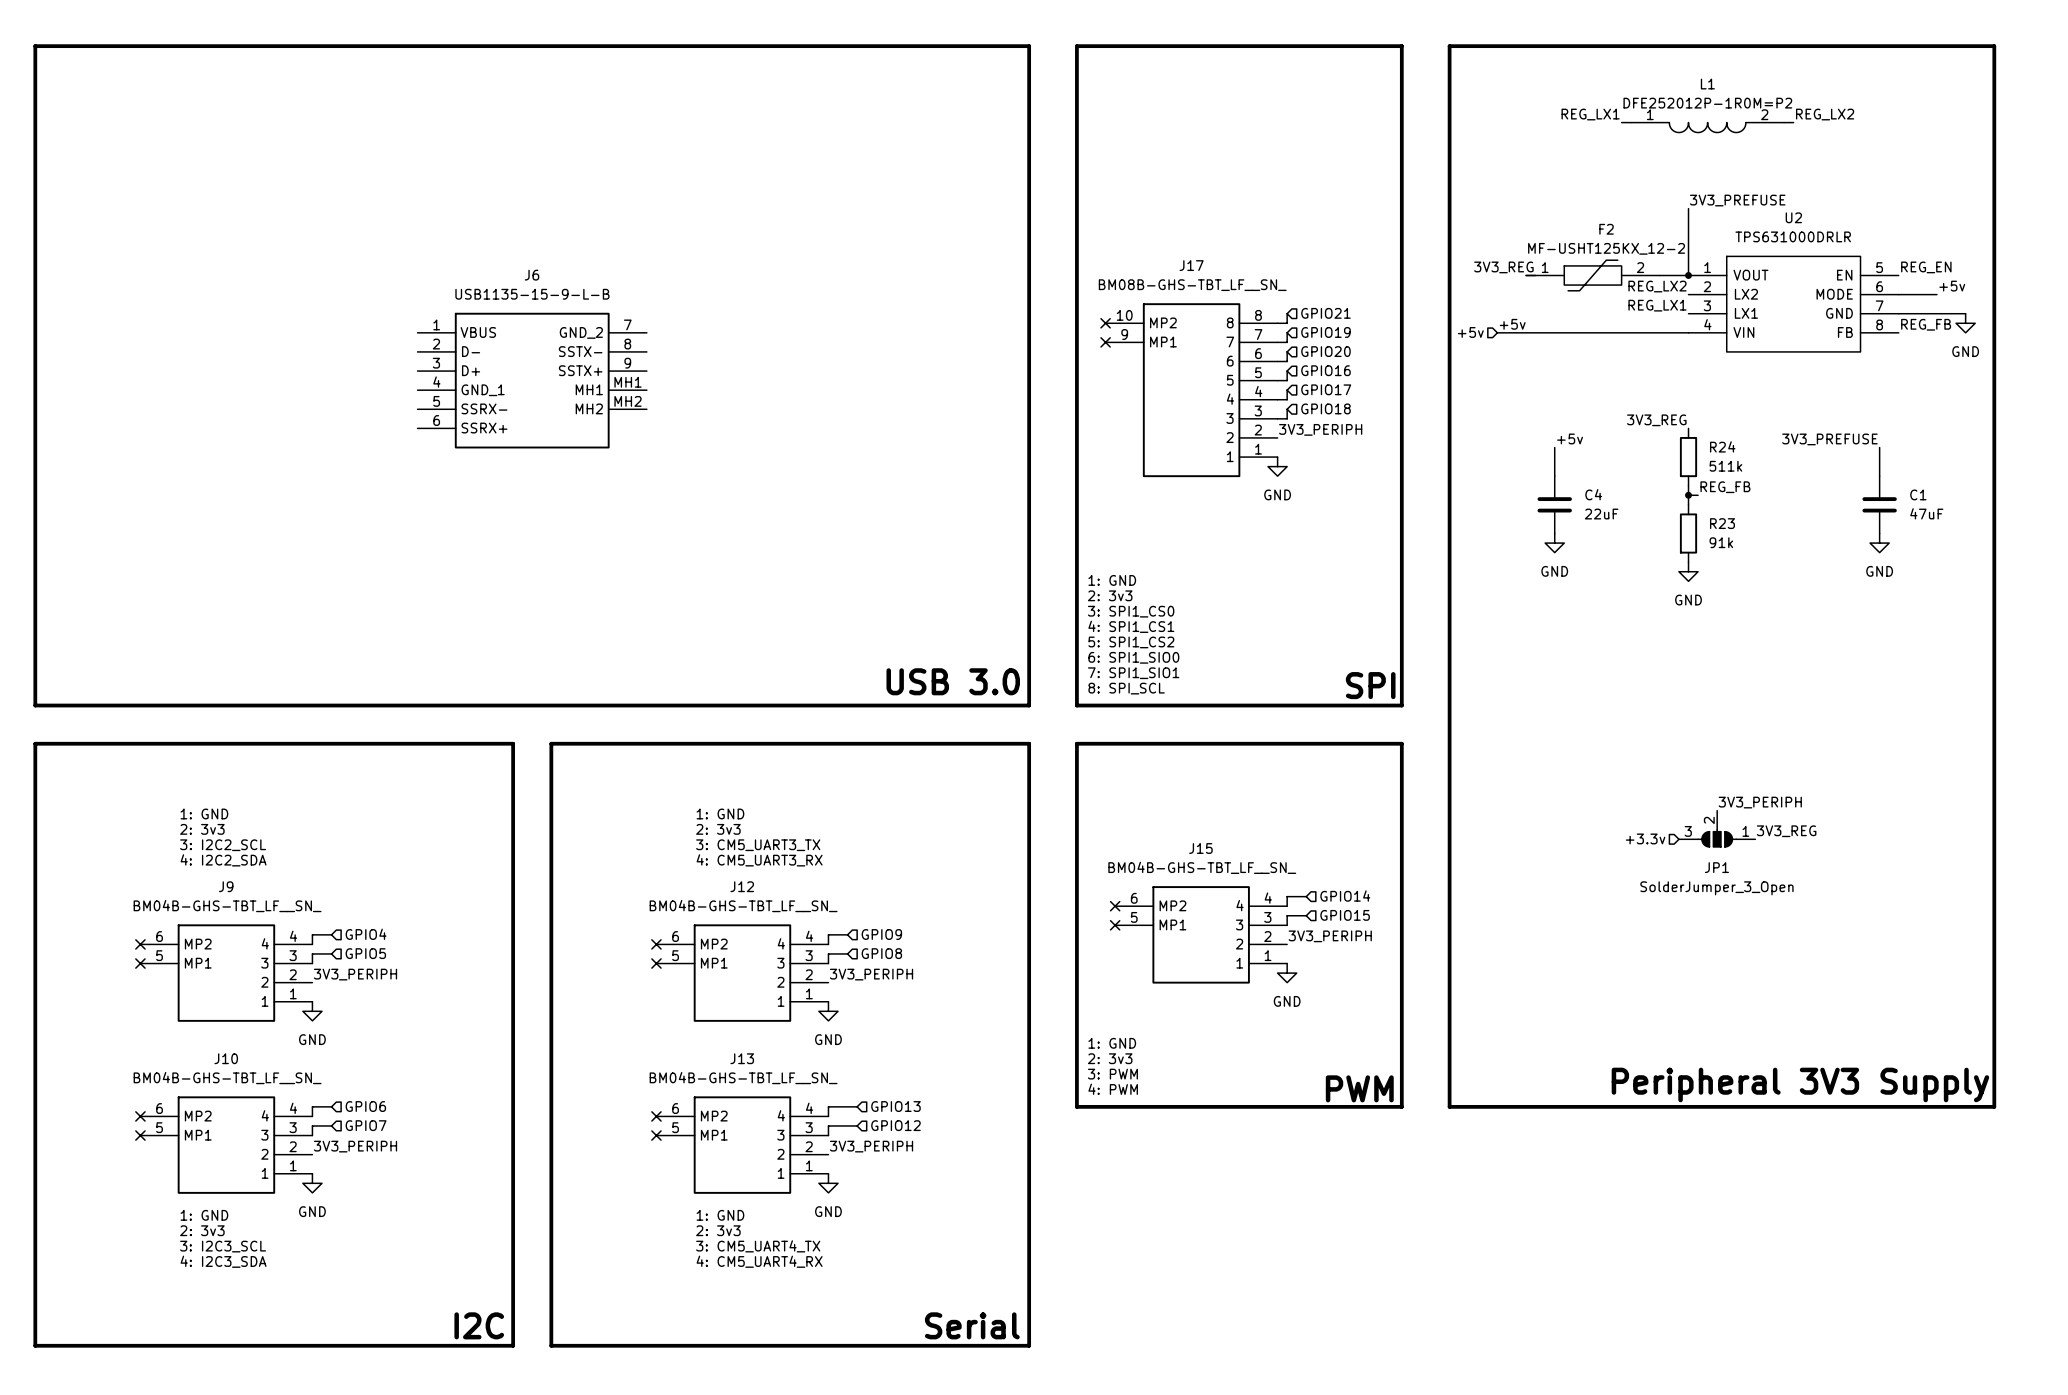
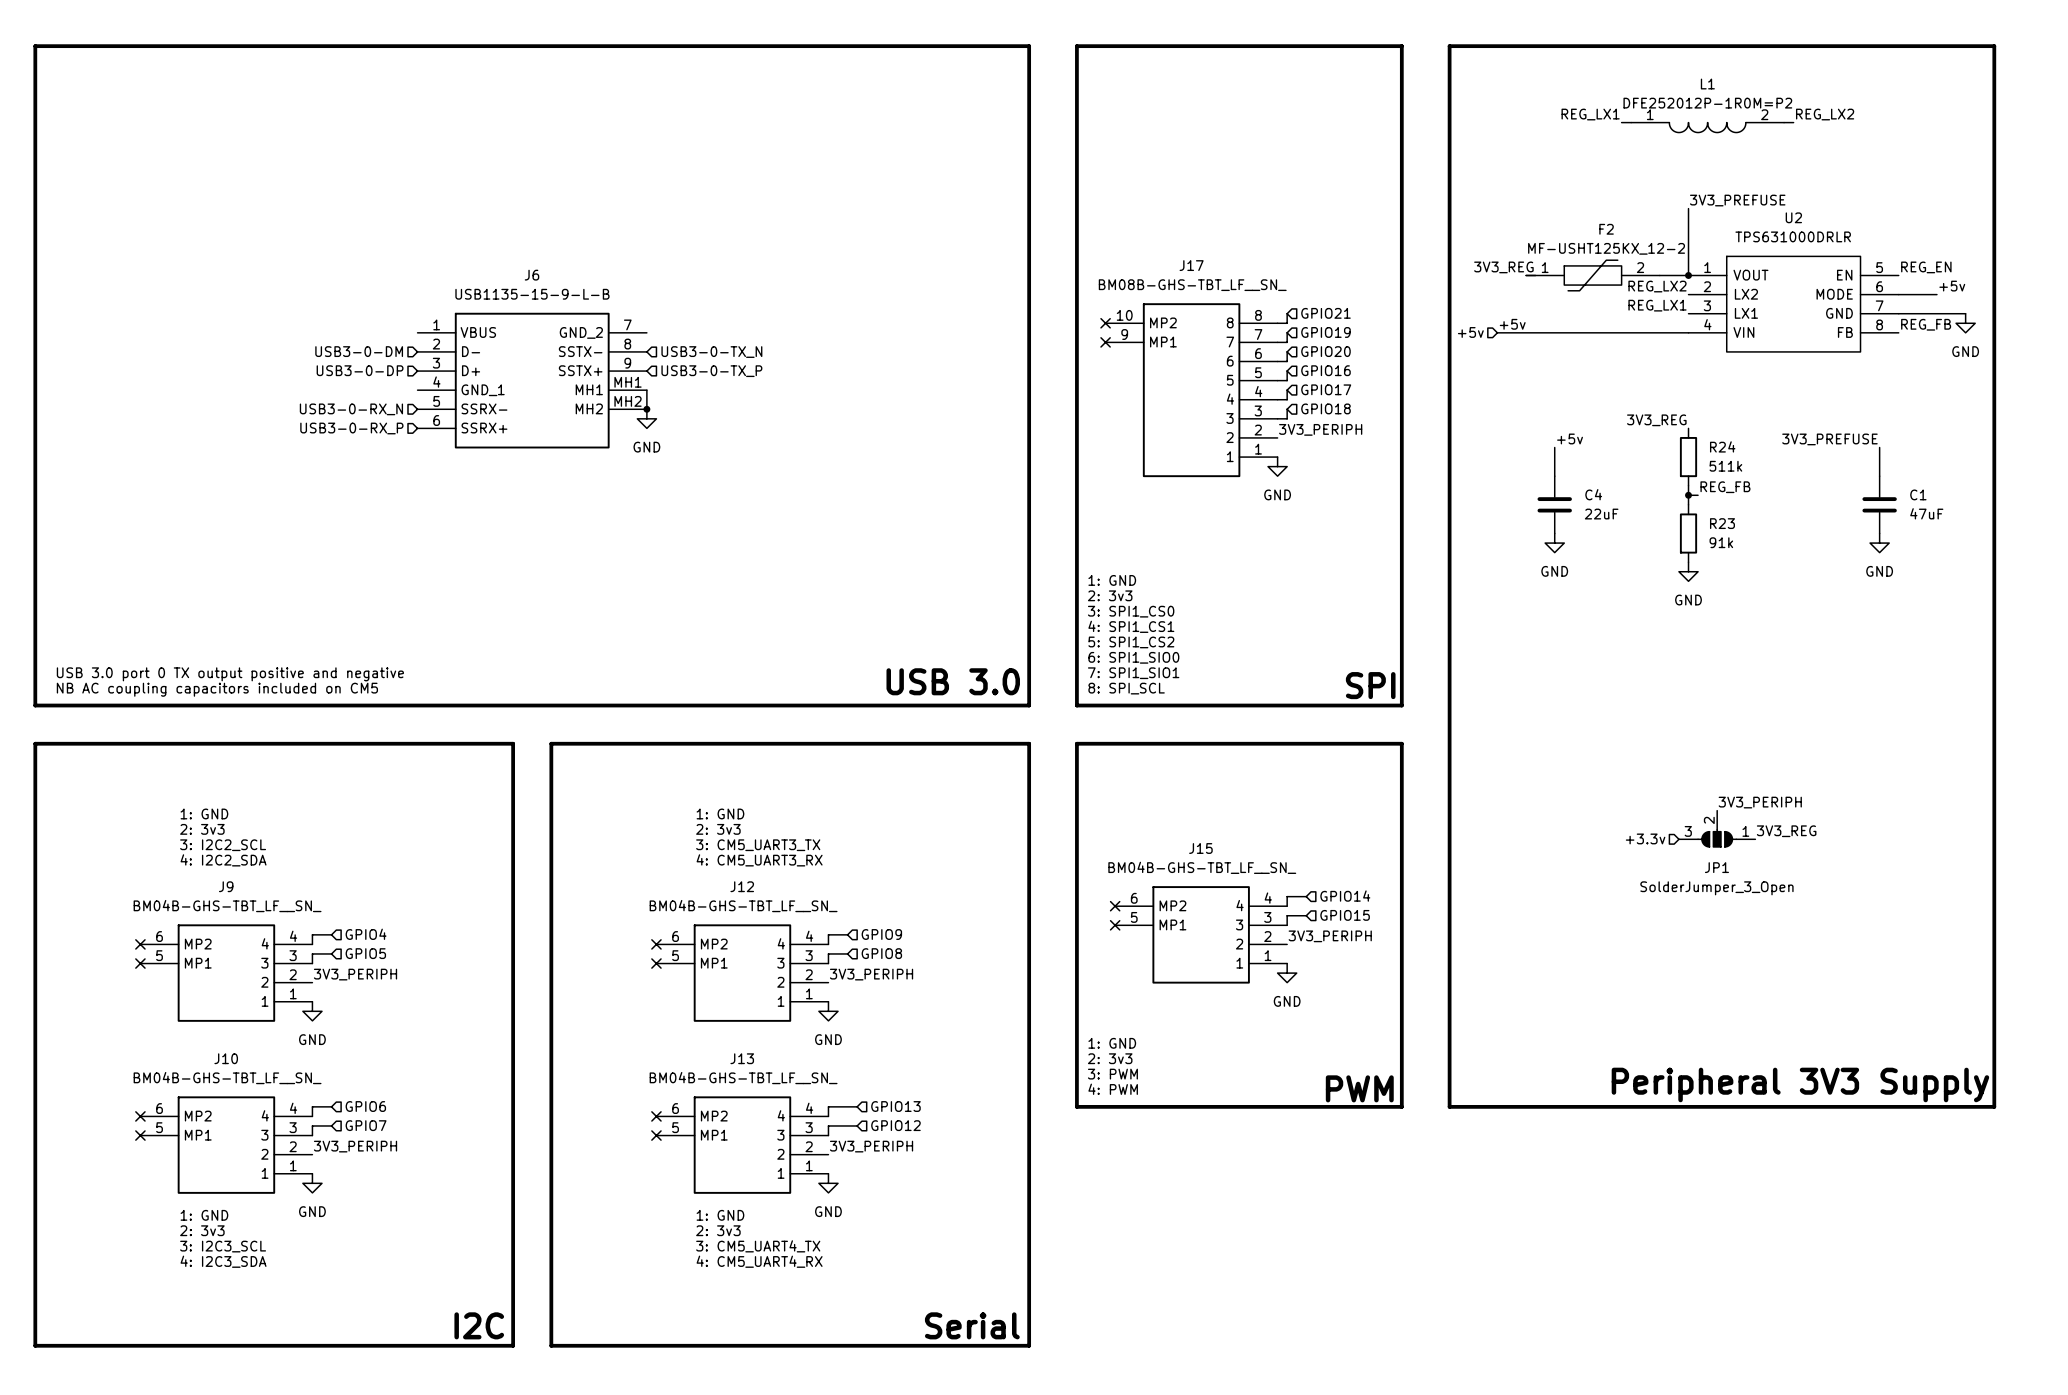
hierarchical label: none -> USB3-0-DM (359, 351)
hierarchical label: none -> USB3-0-TX_N (711, 352)
hierarchical label: none -> USB3-0-DP (360, 370)
hierarchical label: none -> USB3-0-TX_P (711, 371)
wire: none -> (646, 390) (646, 409)
hierarchical label: none -> USB3-0-RX_N (351, 409)
junction: none -> (646, 409)
power symbol: none -> GND (646, 418)
hierarchical label: none -> USB3-0-RX_P (351, 428)
text: none -> USB 3.0 port 0 TX output positive and negative (230, 674)
text: none -> NB AC coupling capacitors included on CM5 (217, 689)

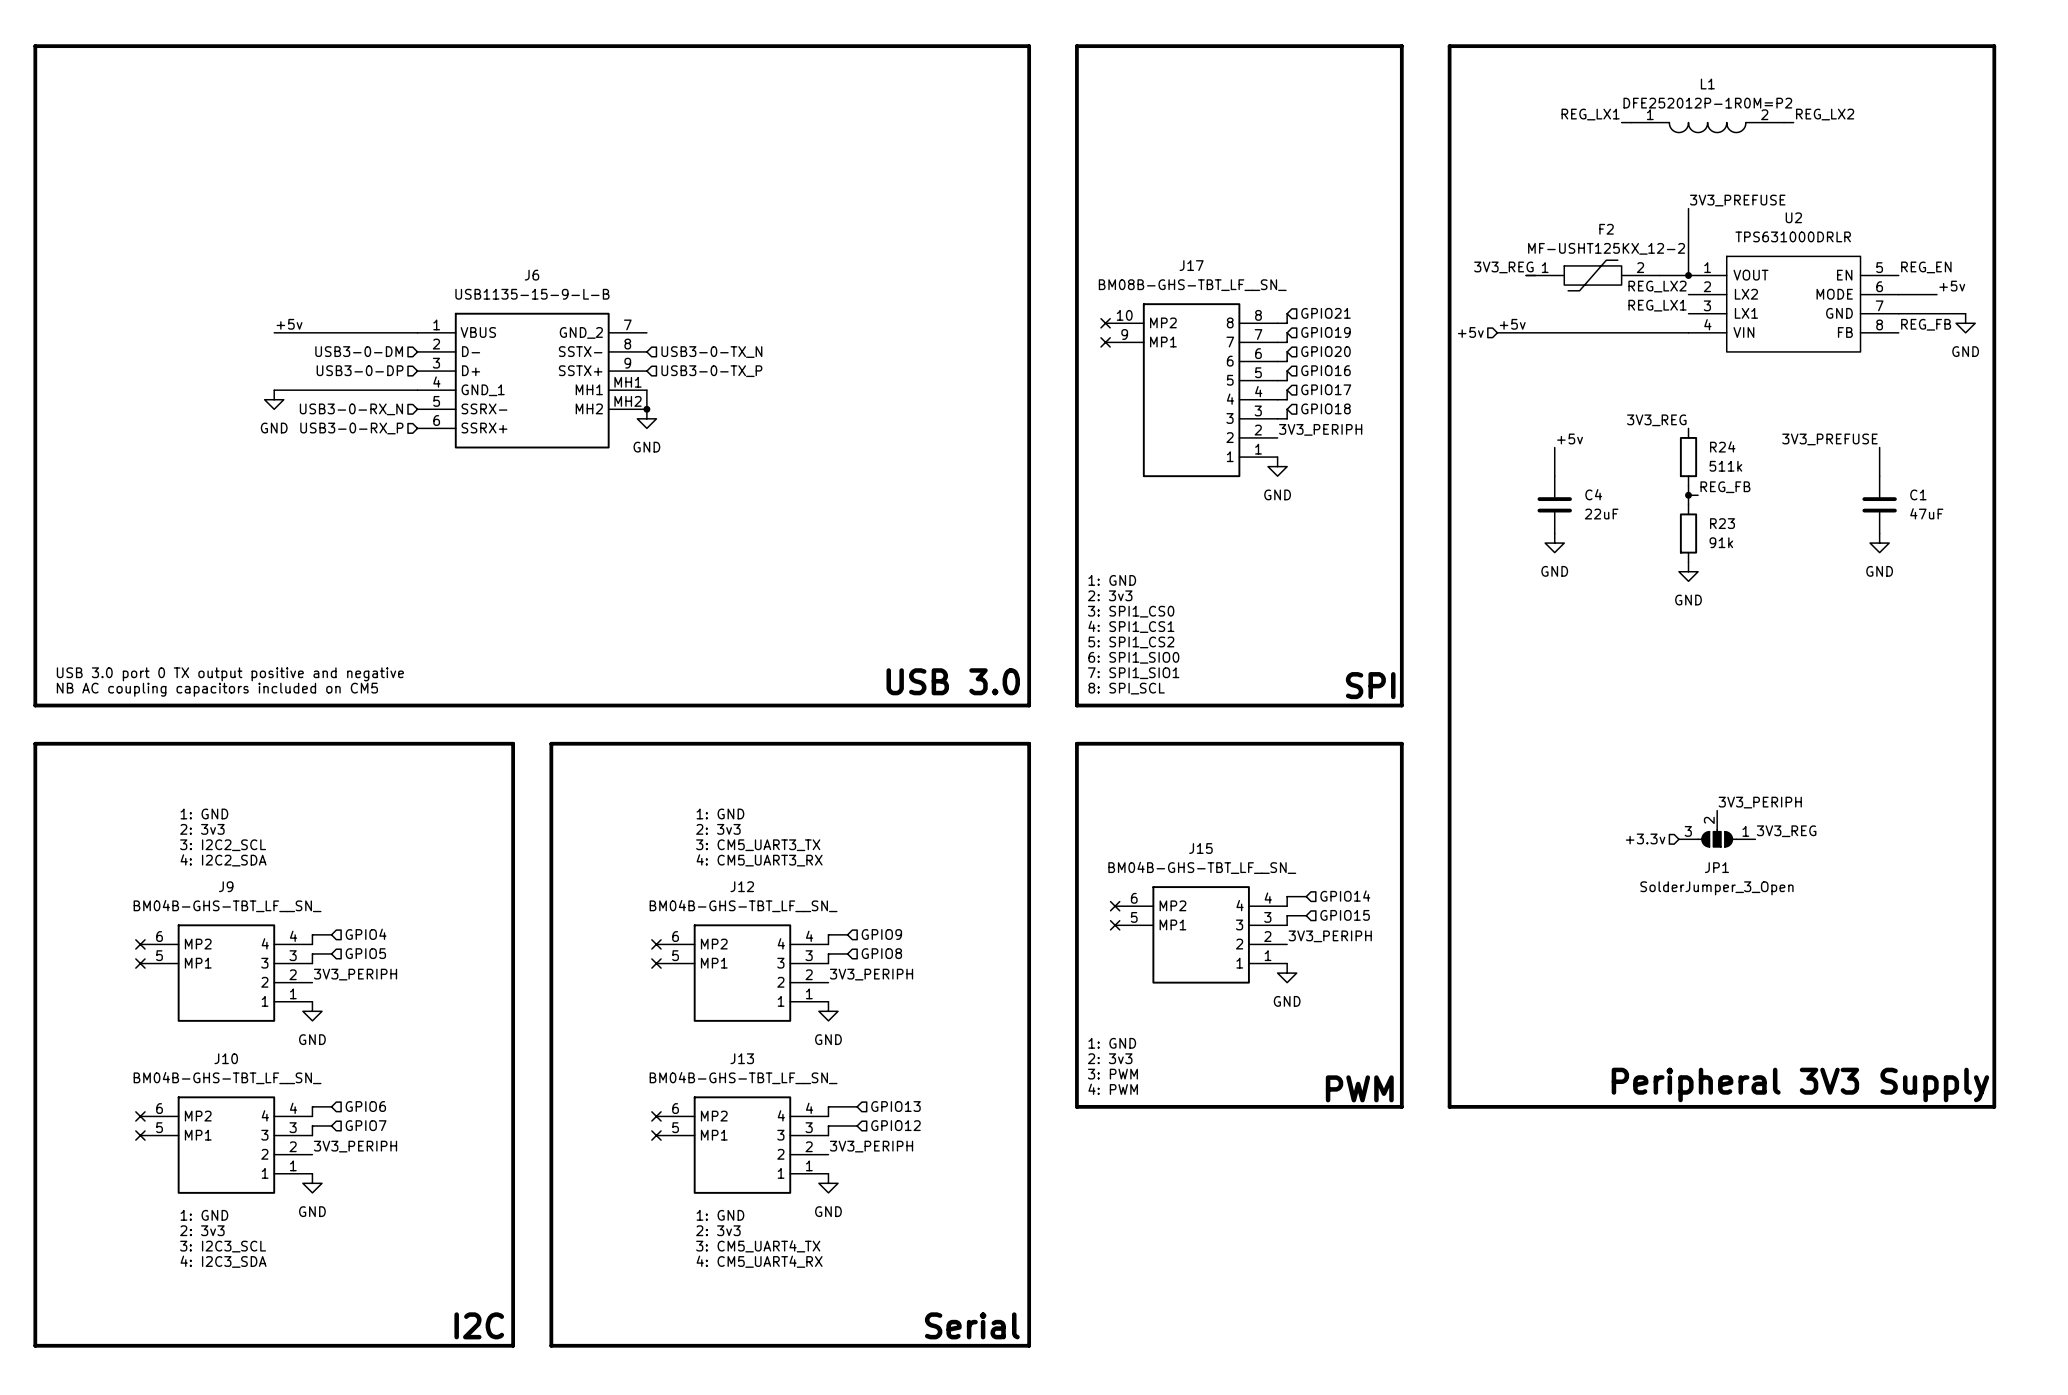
label: none -> +5v (289, 324)
wire: none -> (274, 332) (417, 332)
wire: none -> (274, 390) (417, 390)
power symbol: none -> GND (274, 399)

